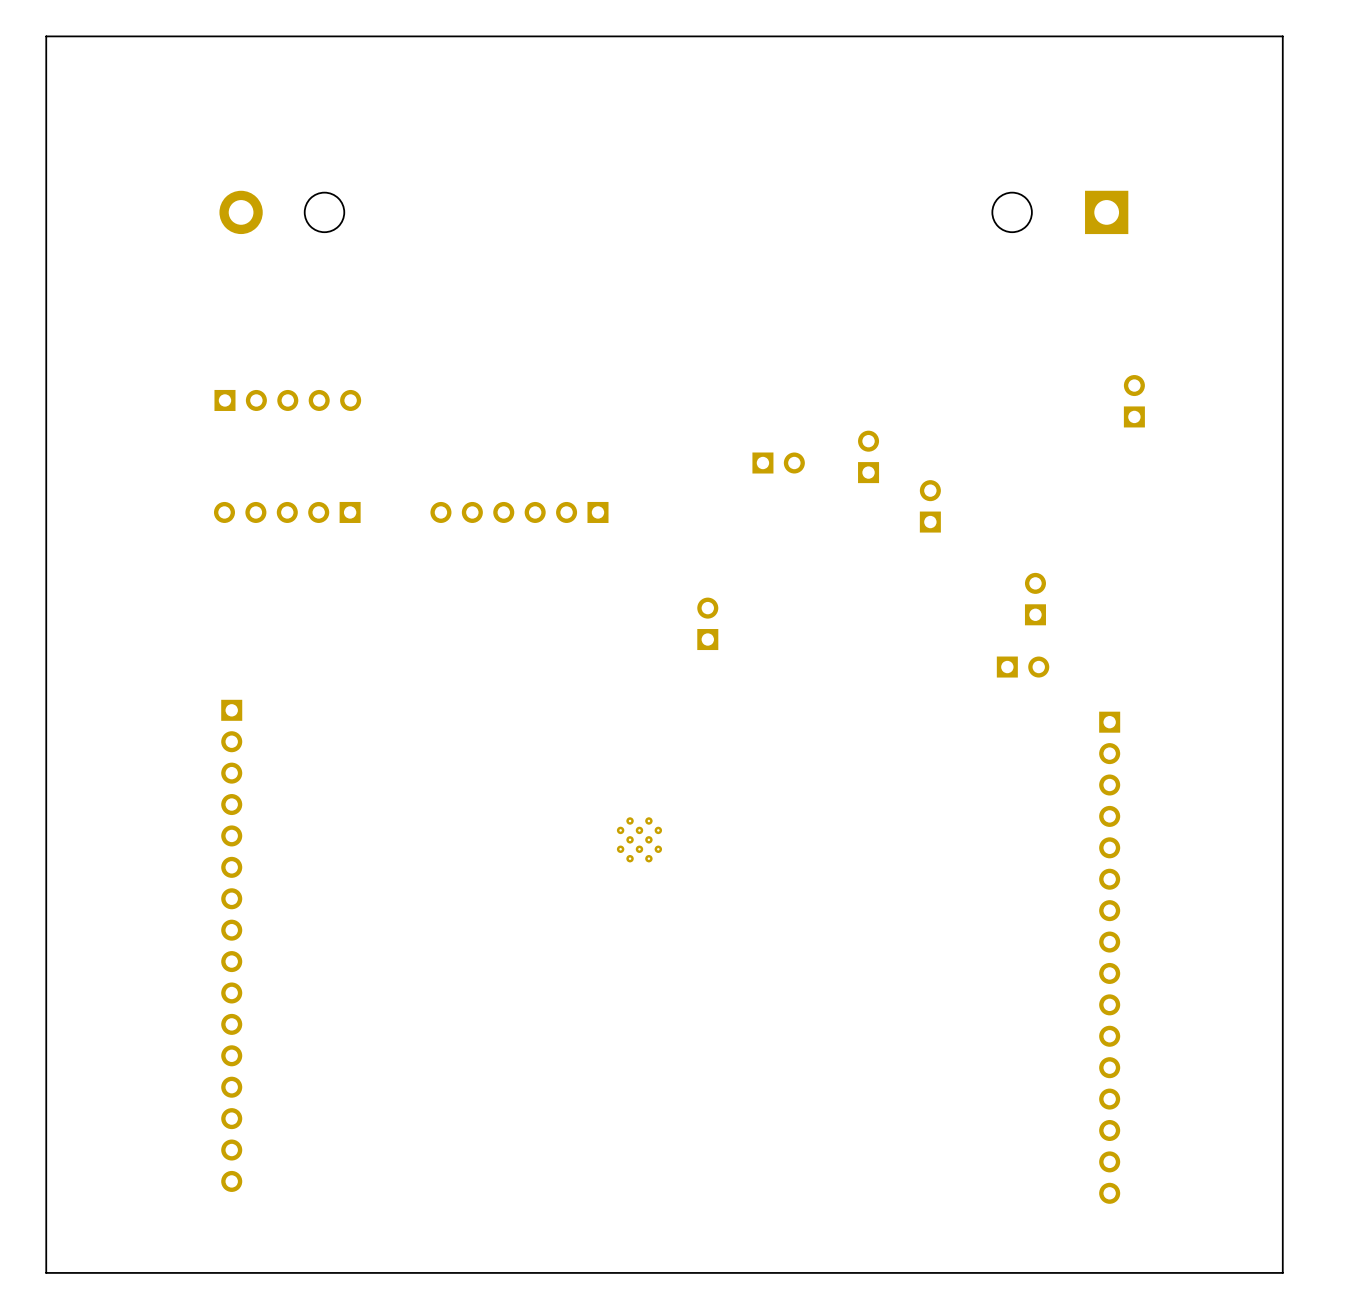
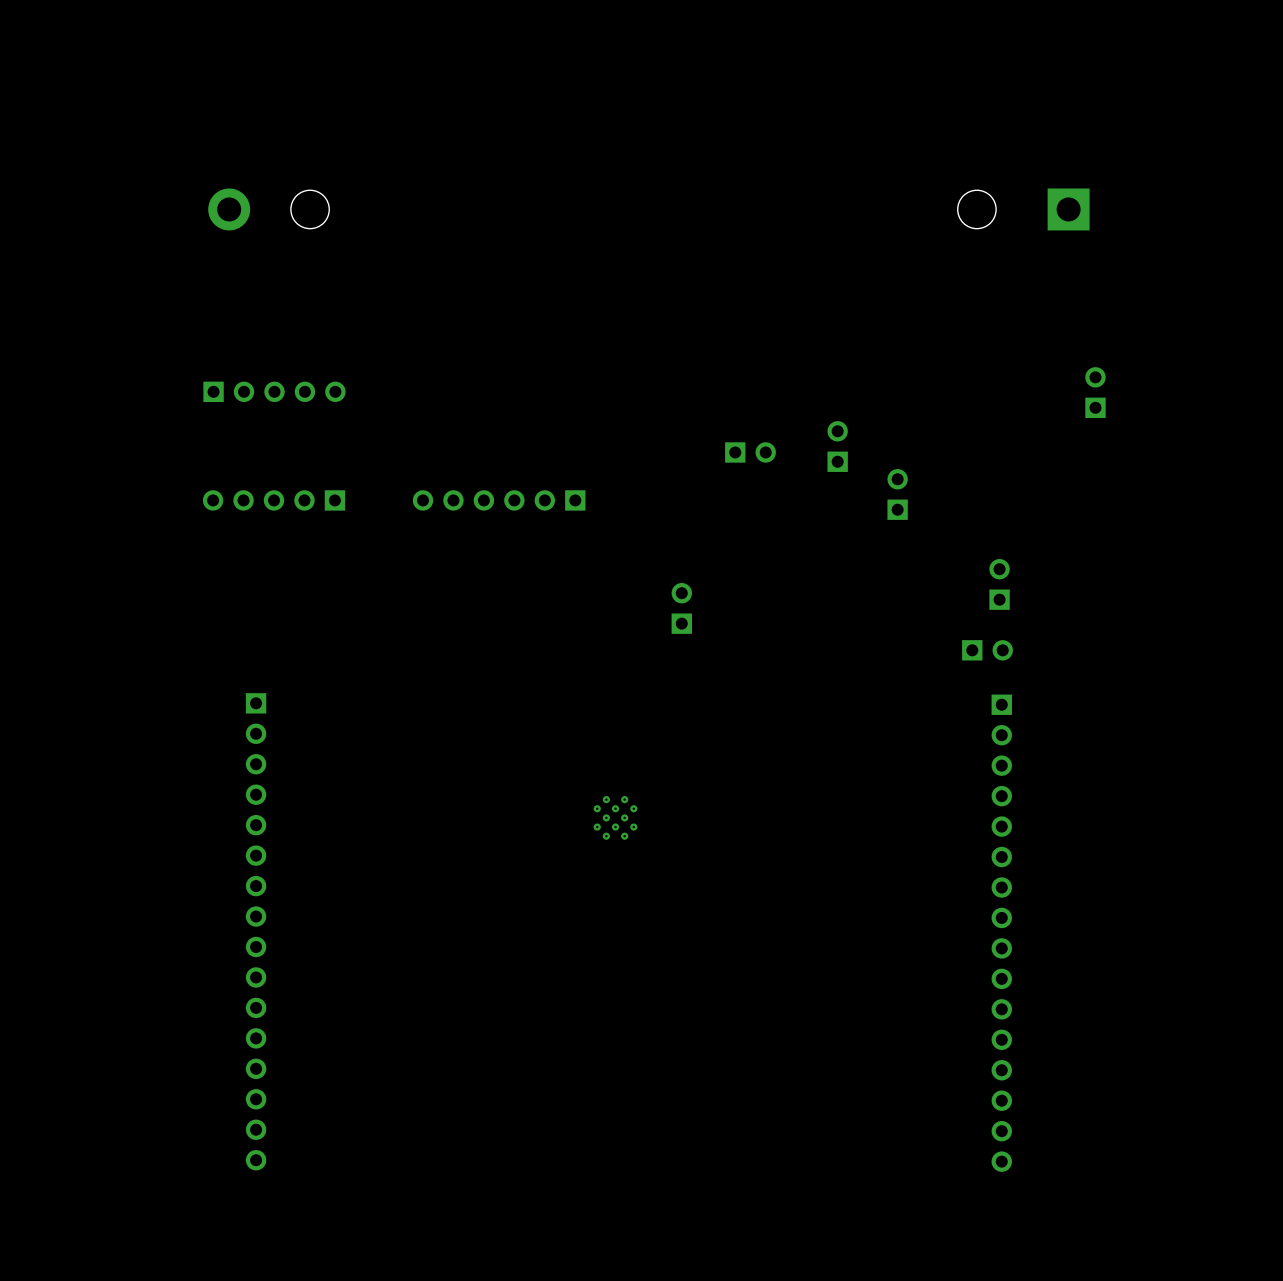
board edge: (1282, 36) (46, 36) (46, 1272) (1282, 1272) (1282, 36) -> none
part position: (231, 945) -> (256, 931)
part position: (1109, 957) -> (1001, 933)

